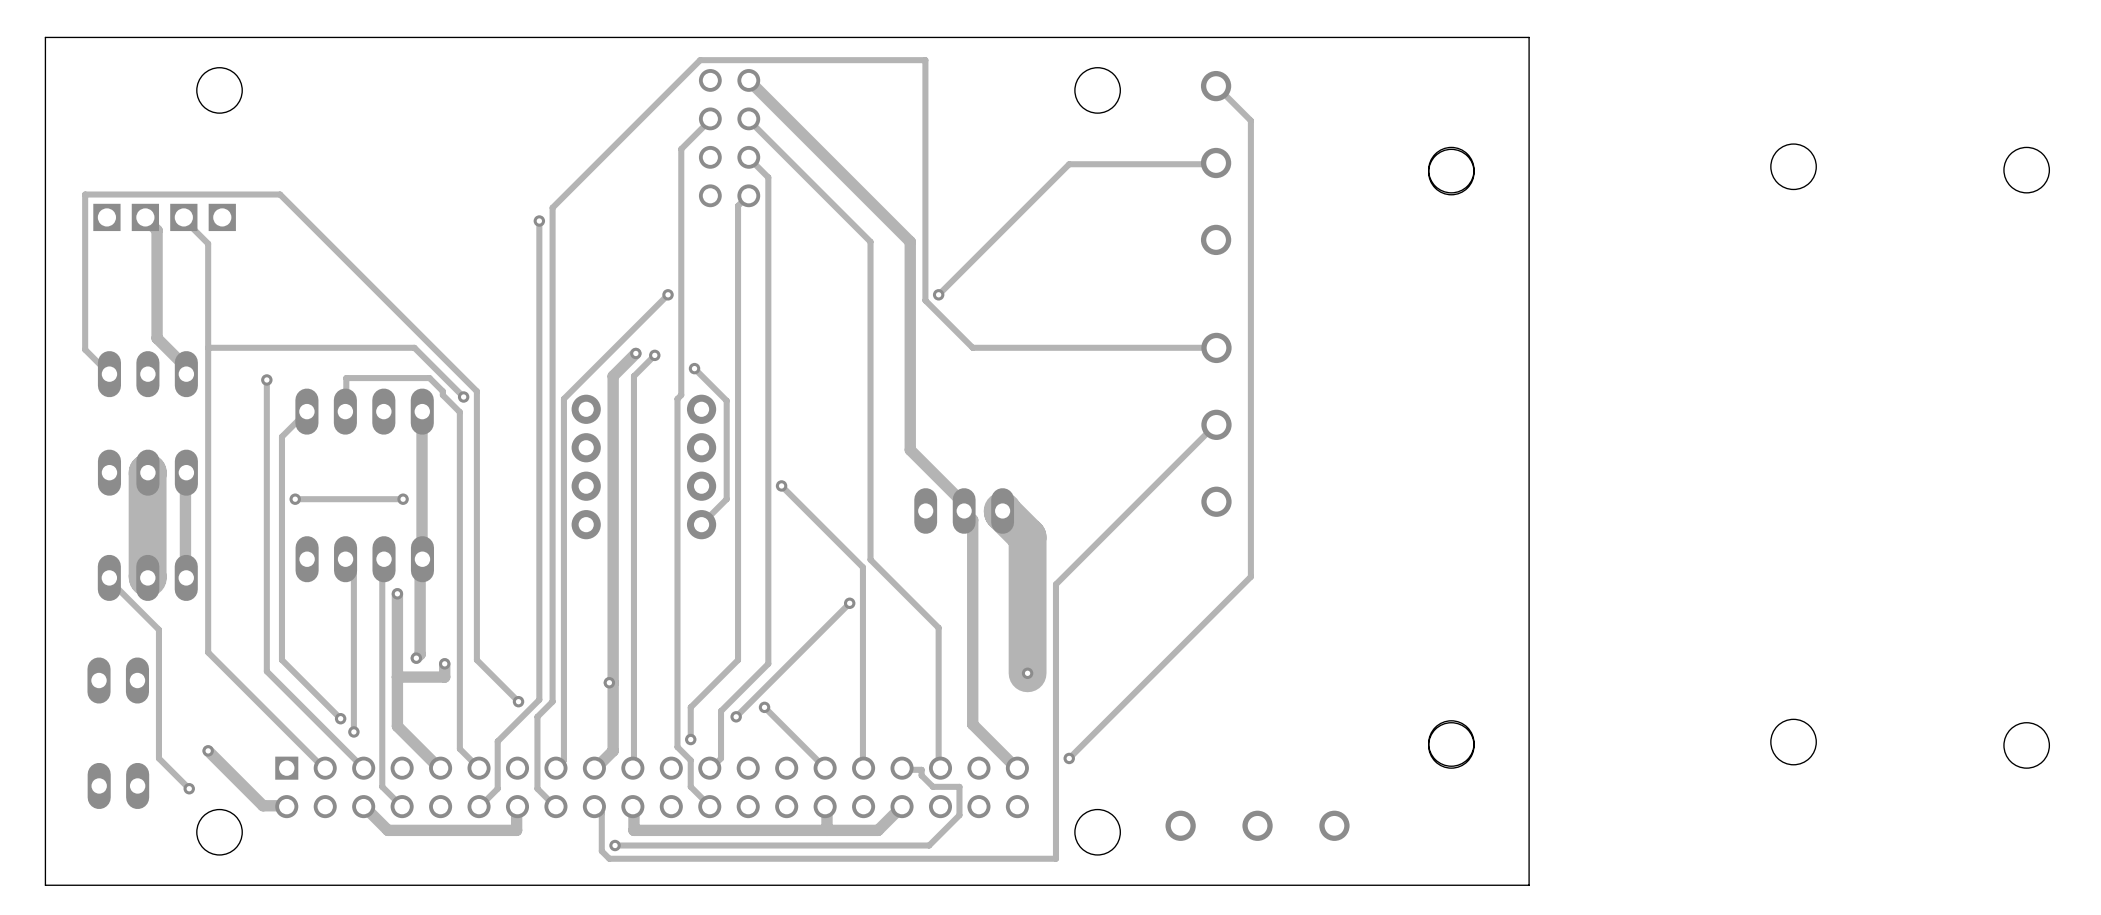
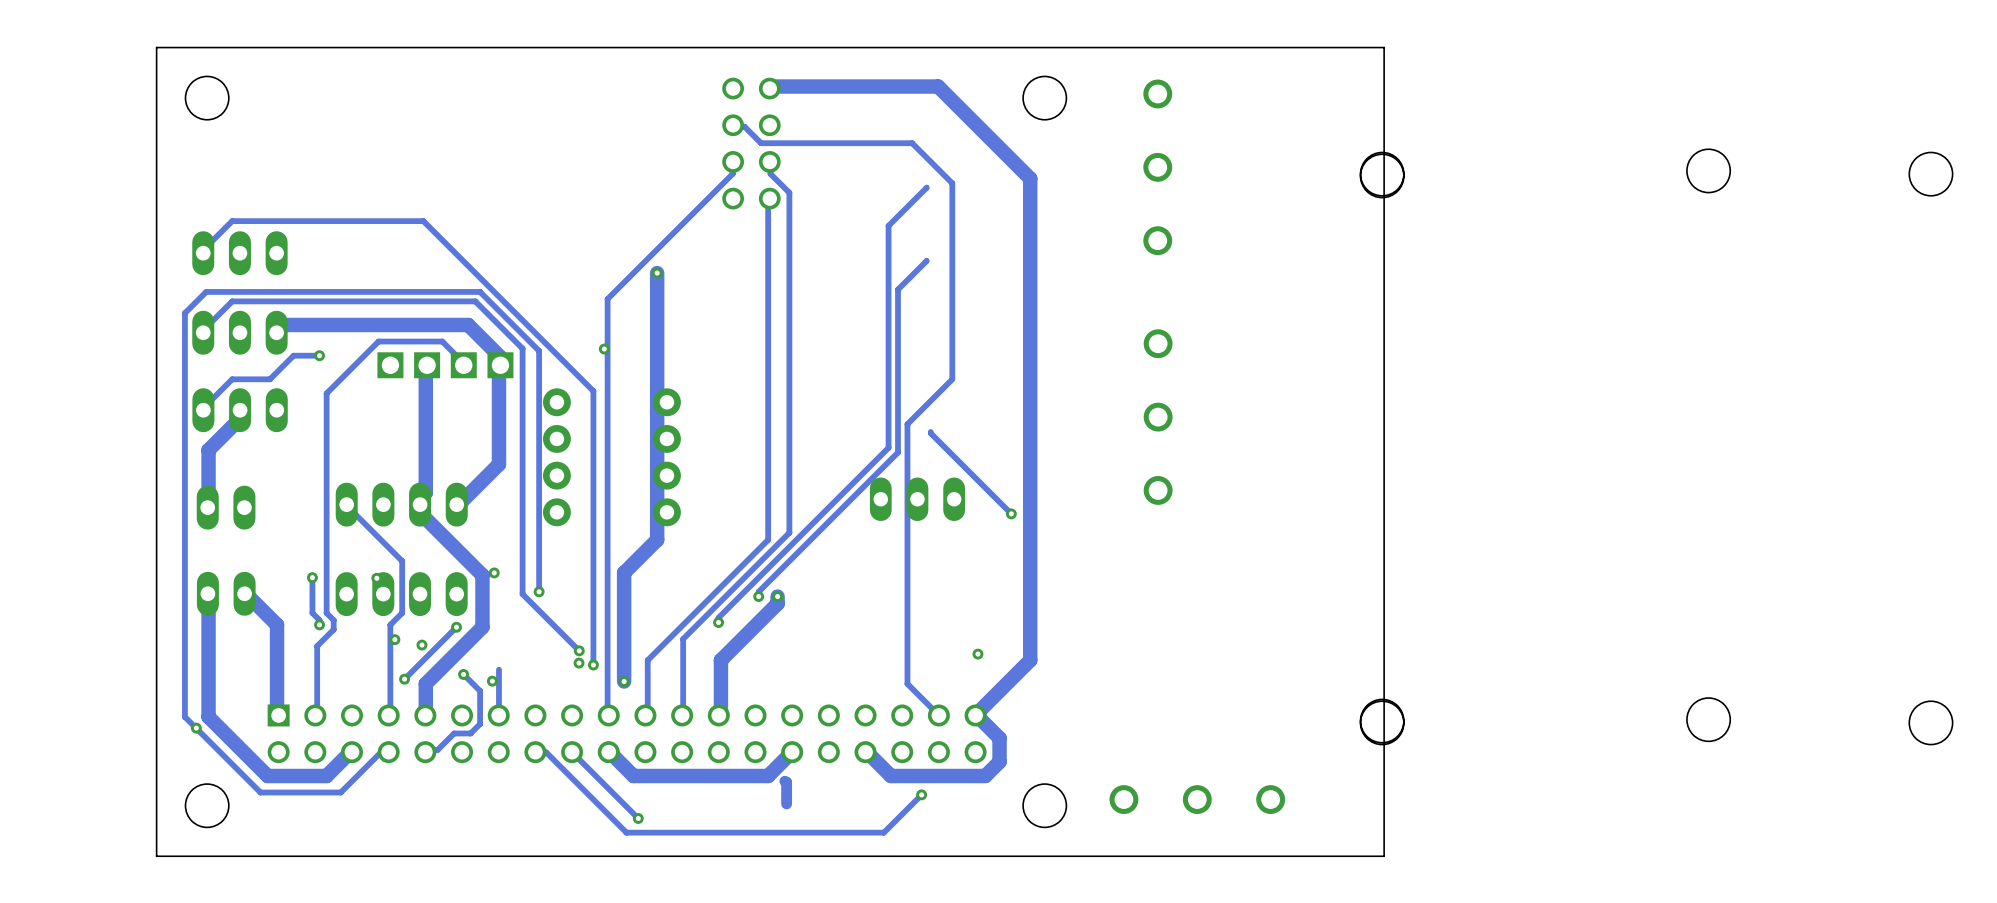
board edge: (166, 37) (45, 37) (45, 885) (166, 885) -> (156, 47) (156, 856)
board edge: (1453, 37) (1529, 37) (1529, 885) (1453, 885) -> (1384, 47) (1384, 856)
track: (748, 80) (910, 241) (910, 449) (961, 501) (961, 506) (972, 520) (972, 724) (1017, 768) -> none
track: none -> (769, 88) (770, 86) (938, 86) (1030, 178) (1030, 660) (975, 715) (999, 738) (999, 761) (985, 775) (890, 775) (865, 752)
track: (1216, 86) (1250, 120) (1250, 576) (1069, 758) -> none
track: (710, 118) (681, 149) (681, 395) (677, 398) (677, 747) (690, 760) (690, 786) (709, 806) -> none
track: (748, 118) (870, 241) (870, 559) (938, 627) (938, 767) (940, 768) -> none
track: none -> (733, 125) (744, 126) (761, 143) (912, 143) (952, 183) (952, 379) (907, 424) (907, 683) (938, 715)
part position: (729, 138) -> (751, 143)
track: (748, 157) (768, 177) (768, 663) (721, 711) (721, 758) (709, 768) -> none
track: none -> (733, 161) (732, 173) (607, 299) (608, 715)
track: none -> (769, 161) (770, 173) (789, 192) (789, 532) (683, 639) (682, 715)
track: (1216, 163) (1069, 164) (938, 294) -> none
track: none -> (926, 187) (888, 225) (888, 447) (718, 617) (718, 622)
track: (748, 195) (738, 205) (738, 660) (690, 707) (690, 739) -> none
track: none -> (769, 198) (768, 199) (768, 539) (647, 660) (647, 714) (645, 715)
track: (145, 217) (157, 230) (157, 338) (185, 366) (186, 374) -> none
part position: (164, 217) -> (445, 365)
track: (183, 217) (208, 243) (208, 652) (325, 768) -> none
track: (539, 221) (539, 699) (497, 741) (497, 788) (479, 806) -> none
via: (539, 221) -> none
track: none -> (203, 253) (201, 251) (232, 221) (423, 221) (593, 391) (593, 665)
part: none -> (239, 253)
track: none -> (926, 260) (898, 289) (898, 452) (758, 591) (758, 596)
track: none -> (657, 273) (657, 539) (624, 572) (624, 681)
track: (668, 294) (563, 398) (563, 760) (555, 768) -> none
via position: (668, 294) -> (657, 273)
via: (938, 294) -> none
track: none -> (203, 332) (201, 332) (232, 301) (475, 301) (522, 348) (522, 594) (579, 650)
part: none -> (239, 332)
track: none -> (276, 332) (284, 325) (468, 325) (501, 358) (498, 367) (498, 464) (456, 504)
track: (208, 347) (414, 347) (463, 397) -> none
track: (1216, 347) (972, 347) (925, 300) (925, 60) (700, 60) (552, 207) (552, 701) (537, 716) (537, 788) (555, 806) -> none
track: (635, 353) (613, 376) (613, 750) (594, 768) -> none
track: (654, 355) (633, 376) (632, 768) -> none
via: (654, 355) -> none
track: none -> (319, 355) (293, 355) (269, 379) (232, 379) (201, 410) (203, 410)
via: none -> (319, 355)
track: (694, 368) (726, 400) (726, 499) (701, 524) -> none
via: (694, 368) -> none
track: none -> (427, 365) (425, 492) (421, 497) (421, 513) (482, 575) (482, 627) (425, 683) (425, 715)
track: none -> (463, 365) (465, 365) (442, 341) (378, 341) (326, 393) (326, 613) (333, 620) (333, 629) (317, 646) (317, 714) (315, 715)
track: (109, 374) (85, 349) (85, 194) (280, 194) (476, 391) (476, 660) (518, 701) -> none
part: (147, 374) -> none
track: (266, 379) (266, 671) (363, 768) -> none
via: (266, 379) -> none
via: (463, 397) -> none
track: (306, 411) (281, 436) (281, 660) (340, 718) -> none
track: (345, 411) (346, 378) (429, 378) (459, 412) (459, 748) (479, 768) -> none
part: (364, 411) -> none
track: (422, 411) (422, 559) (420, 563) (420, 654) (416, 658) -> none
track: none -> (240, 410) (239, 419) (208, 450) (207, 507)
part: none -> (240, 410)
track: (1216, 424) (1055, 584) (1055, 858) (609, 858) (601, 851) (601, 813) (594, 806) -> none
track: none -> (930, 432) (1011, 513)
track: (147, 472) (147, 577) -> none
part: (147, 472) -> none
track: (186, 472) (186, 577) -> none
track: (781, 485) (862, 567) (863, 768) -> none
via: (781, 485) -> none
via: (295, 499) -> none
track: (403, 499) (295, 499) -> none
via: (403, 499) -> none
track: (1002, 510) (1027, 537) (1027, 673) -> none
track: none -> (346, 504) (402, 561) (402, 613) (390, 624) (390, 714) (388, 715)
part: none -> (401, 504)
part: none -> (226, 507)
via: none -> (1011, 513)
track: (345, 559) (353, 567) (353, 731) -> none
part: (364, 559) -> none
track: (384, 559) (382, 559) (382, 786) (402, 806) -> none
track: (109, 577) (109, 580) (158, 629) (158, 758) (189, 788) -> none
part: (147, 577) -> none
via: none -> (494, 572)
track: none -> (312, 577) (312, 613) (319, 620) (319, 624)
via: none -> (312, 577)
track: (397, 593) (397, 726) (440, 768) -> none
track: (849, 603) (736, 716) -> none
via: (849, 603) -> none
track: none -> (539, 591) (539, 350) (480, 291) (206, 291) (184, 313) (184, 716) (260, 792) (340, 792) (380, 752) (388, 752)
via: none -> (539, 591)
track: none -> (207, 593) (208, 716) (267, 775) (326, 775) (352, 752)
part: none -> (226, 593)
track: none -> (244, 593) (277, 624) (277, 714) (278, 715)
part: none -> (401, 594)
via: none -> (758, 596)
track: none -> (777, 596) (777, 603) (720, 660) (720, 714) (718, 715)
via: none -> (777, 596)
via: none -> (718, 622)
via: none -> (319, 624)
track: none -> (456, 627) (404, 679)
via: none -> (456, 627)
track: (444, 663) (444, 677) (397, 677) -> none
via: none -> (579, 650)
part: (118, 680) -> none
via: none -> (593, 665)
track: none -> (498, 669) (498, 715)
track: none -> (463, 674) (480, 690) (480, 724) (470, 733) (454, 733) (437, 750) (425, 750) (425, 752)
via: none -> (463, 674)
via: none -> (404, 679)
via: none -> (624, 681)
track: (764, 707) (825, 767) -> none
via: (764, 707) -> none
via: (736, 716) -> none
via: (340, 718) -> none
via: (353, 731) -> none
via: (690, 739) -> none
track: (208, 750) (263, 805) (286, 806) -> none
via: (1069, 758) -> none
track: (902, 768) (902, 769) (921, 769) (921, 775) (932, 786) (959, 786) (959, 815) (929, 845) (615, 845) -> none
track: none -> (535, 752) (546, 752) (626, 832) (883, 832) (921, 794)
track: none -> (572, 752) (638, 818)
track: none -> (792, 752) (768, 775) (633, 775) (608, 752)
part: (118, 785) -> none
part position: (652, 787) -> (627, 733)
via: (189, 788) -> none
track: (517, 806) (516, 830) (387, 830) (363, 806) -> none
track: (902, 806) (878, 830) (633, 830) (632, 806) -> none
via: none -> (921, 794)
via: (615, 845) -> none
via: none -> (638, 818)

